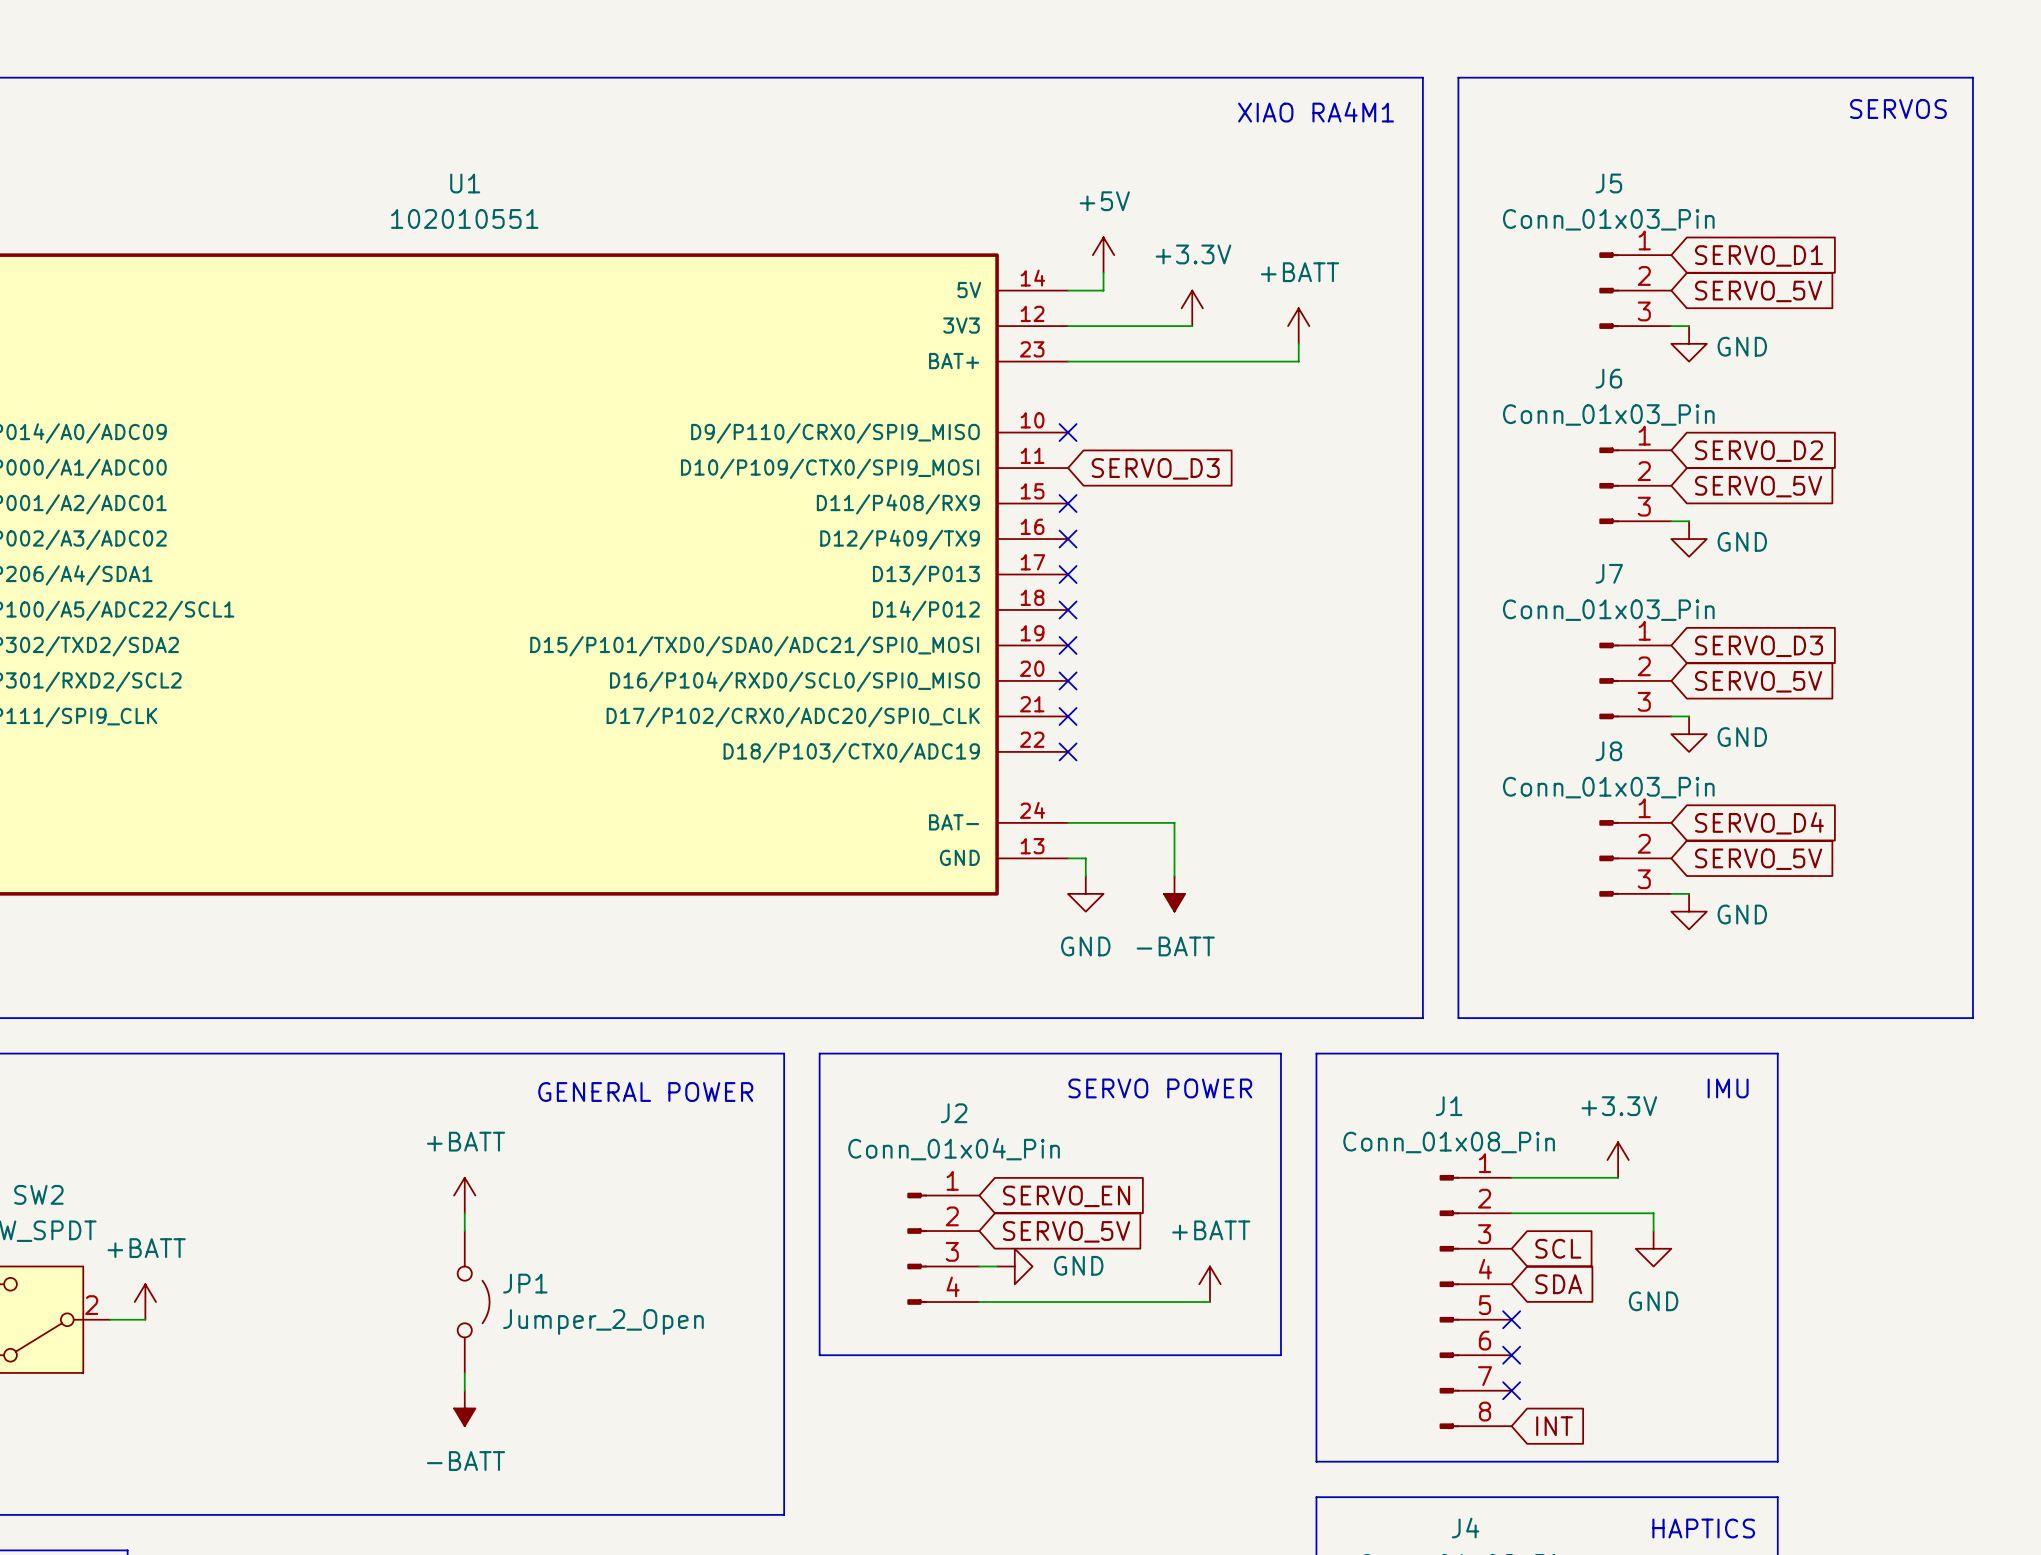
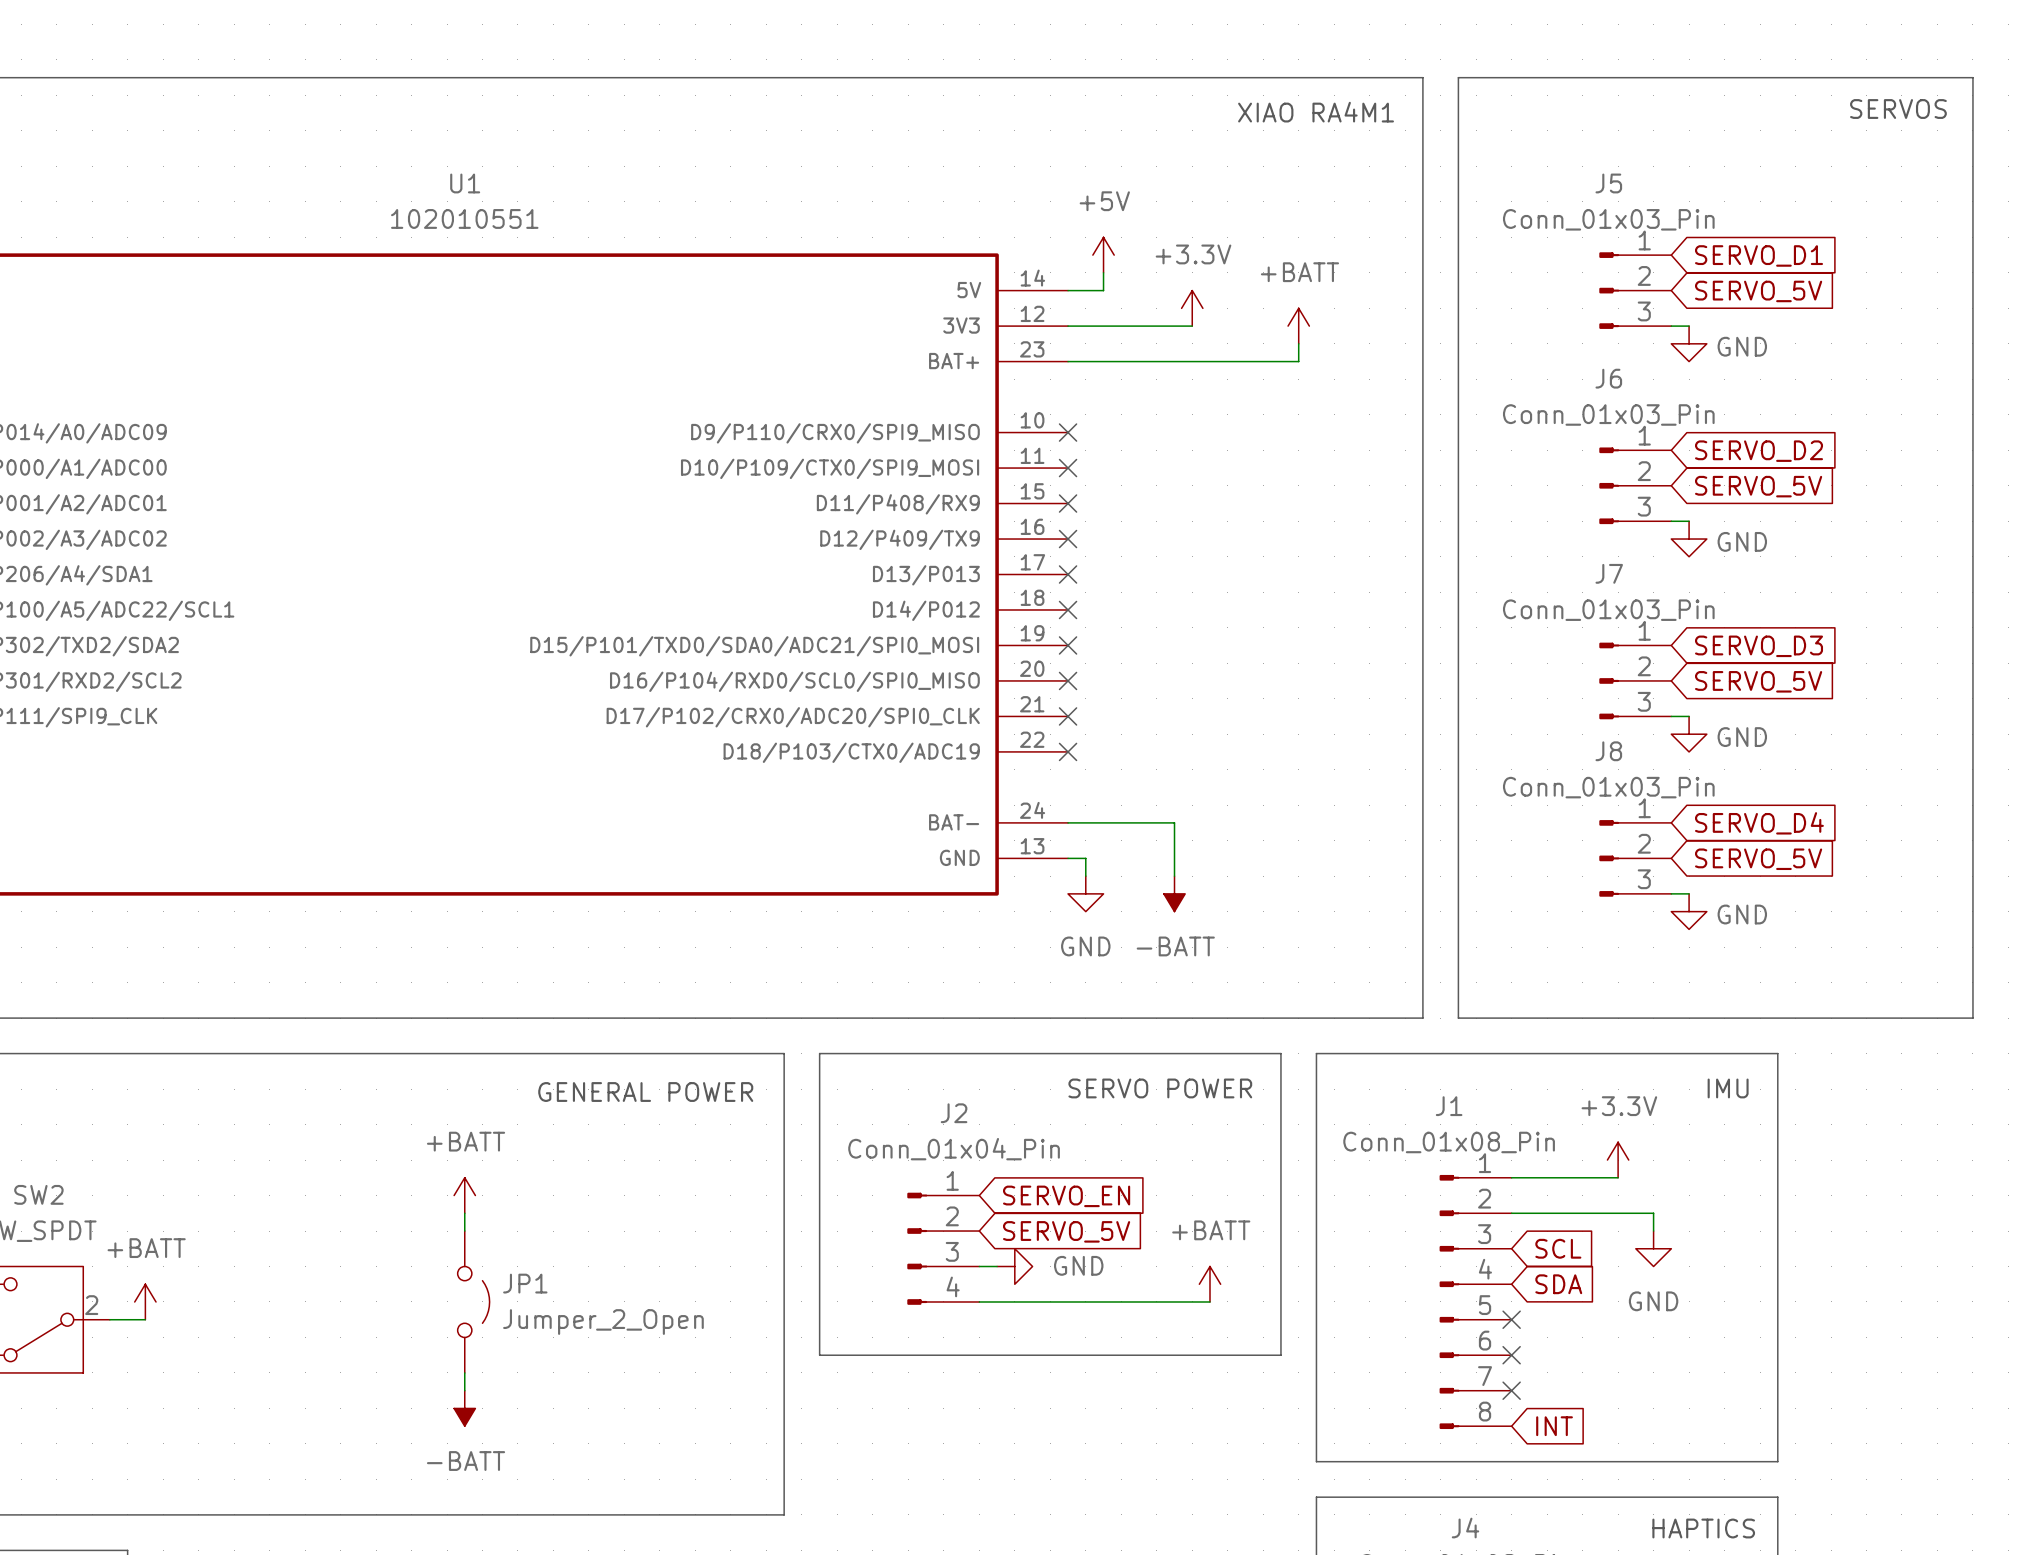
no-connect mark: none -> (1068, 468)
global label: SERVO_D3 (1155, 468) -> none

